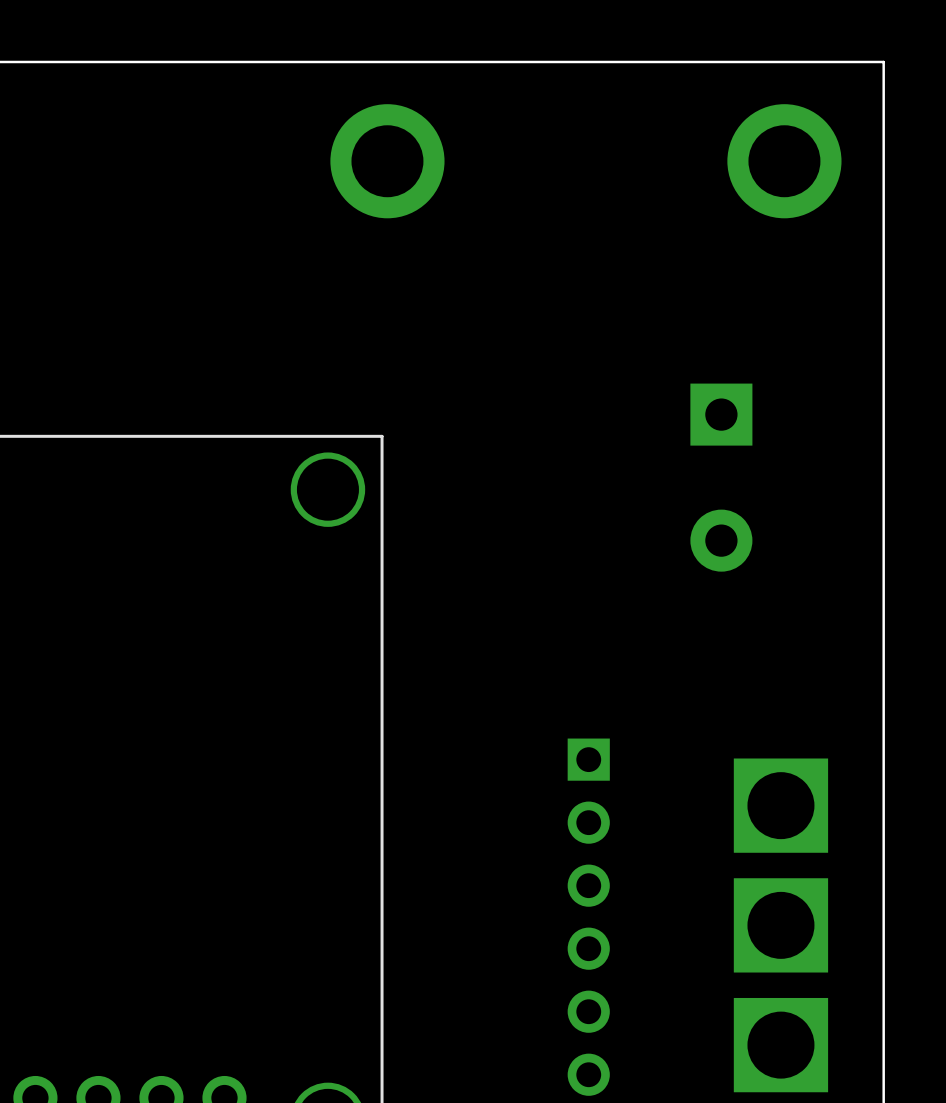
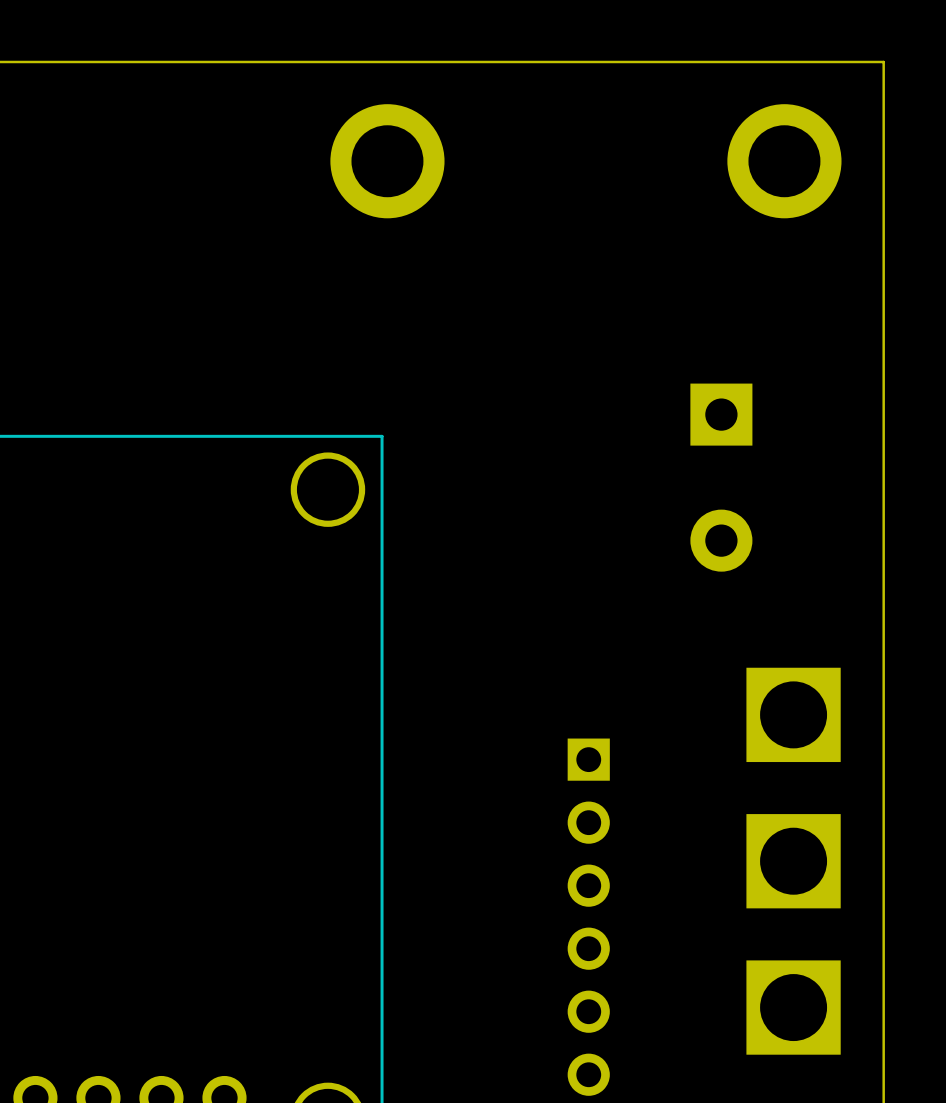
part: none -> (793, 714)
part: (780, 805) -> none
part: none -> (793, 861)
part: (780, 925) -> none
part position: (780, 1045) -> (793, 1007)

